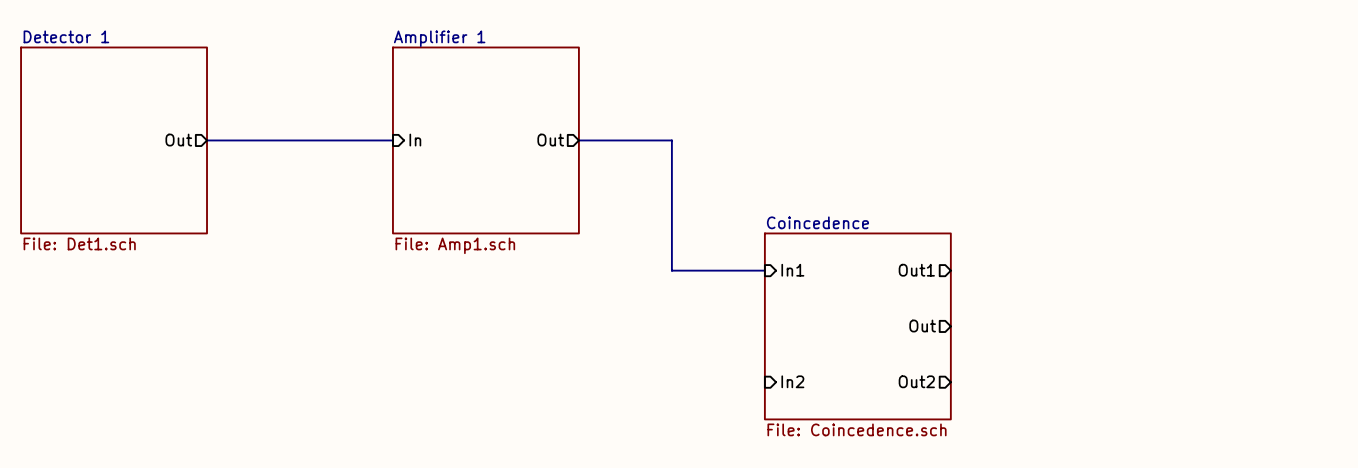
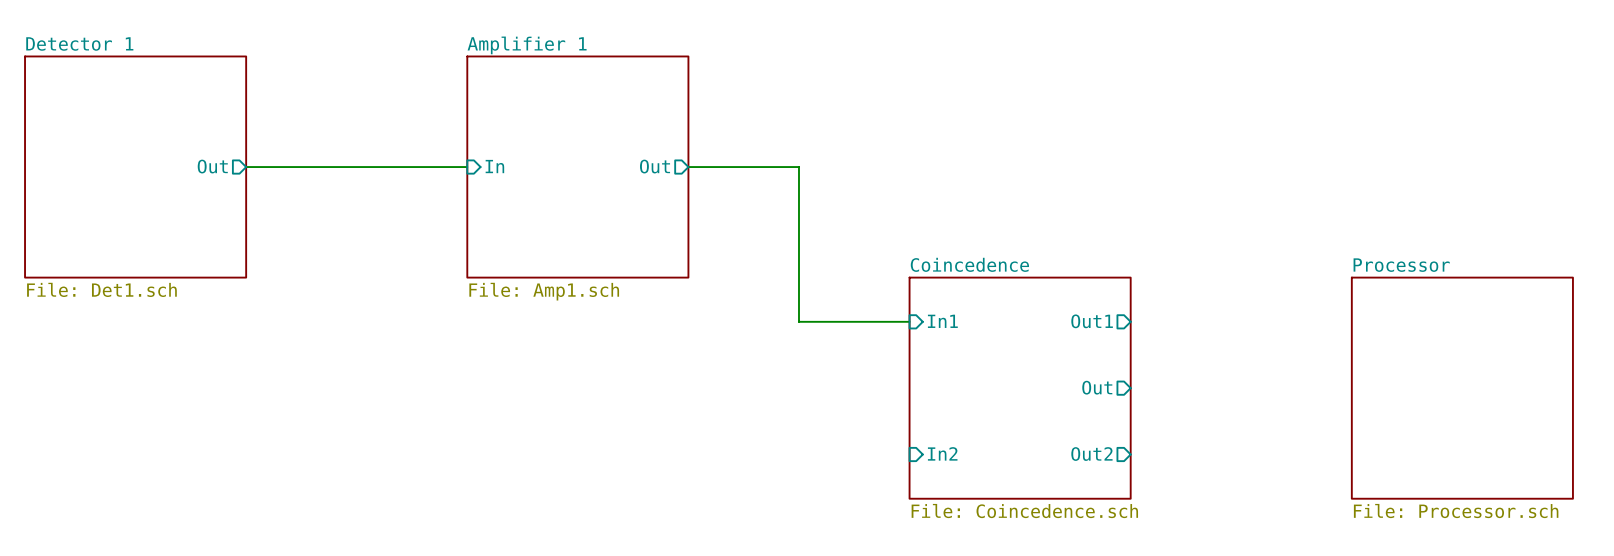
sheet Processor: none -> File: Processor.sch (1462, 388)

